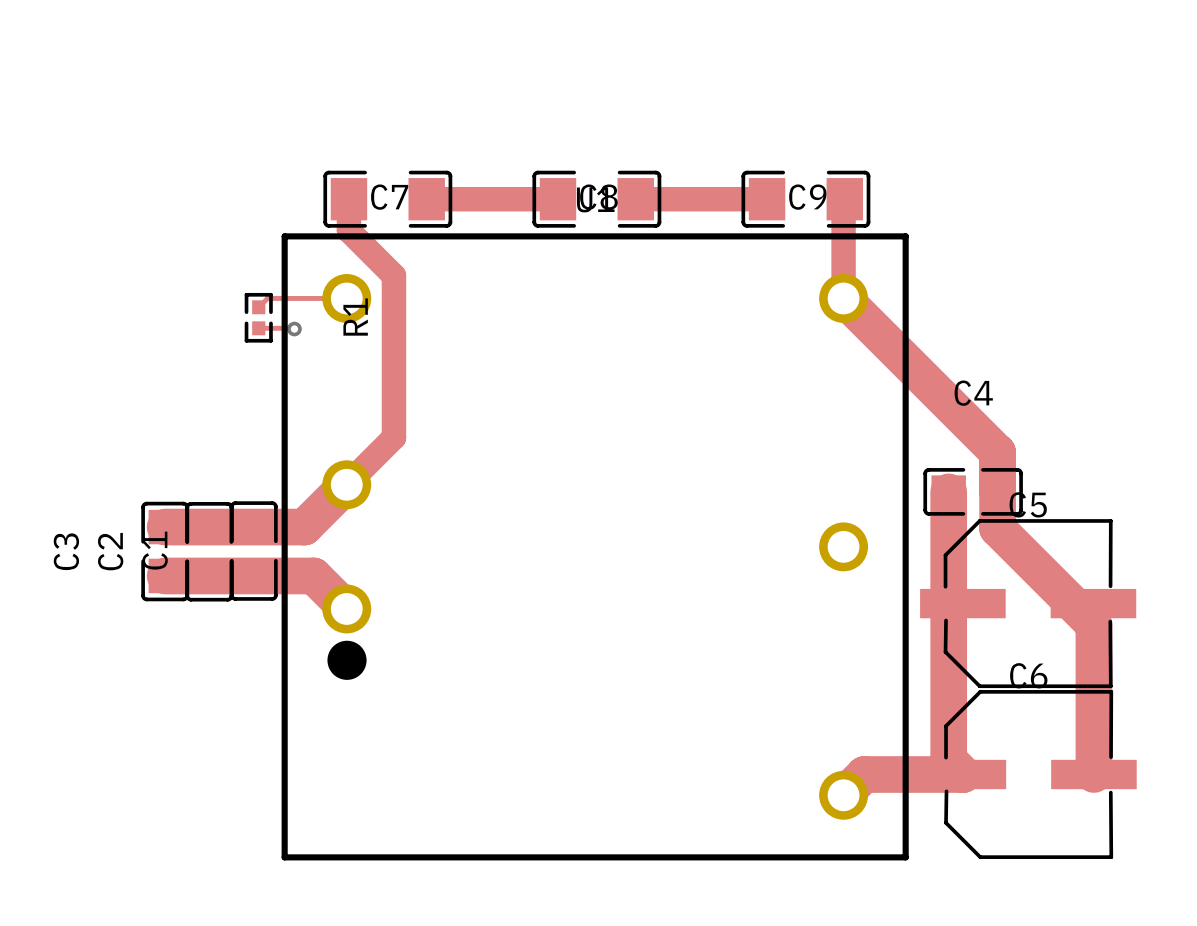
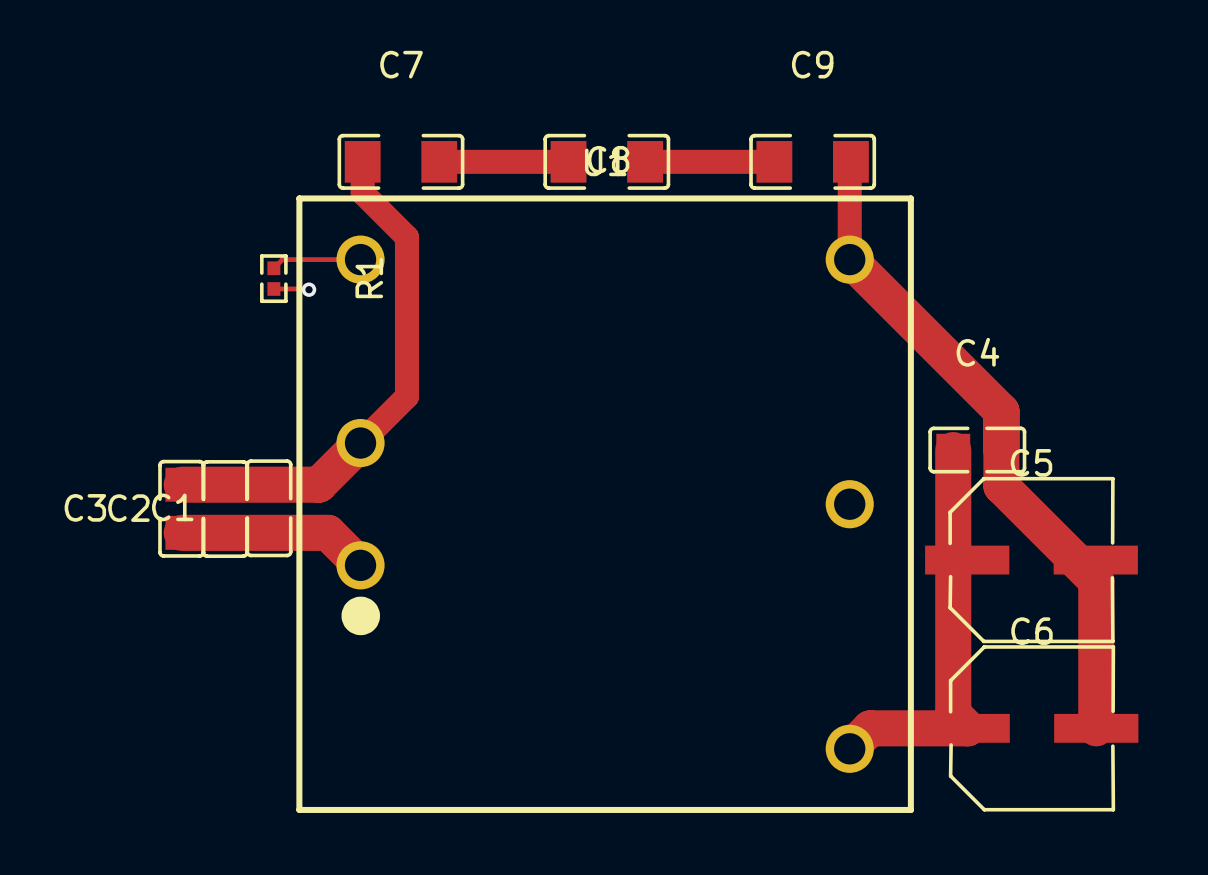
C7 name position: C7 (389, 197) -> C7 (401, 64)
C9 name position: C9 (807, 197) -> C9 (812, 64)
C1 name rotation: 0° (155, 550) -> 90° clockwise (172, 507)
C3 name rotation: 0° (66, 551) -> 90° clockwise (85, 507)
C2 name rotation: 0° (110, 551) -> 90° clockwise (128, 508)

